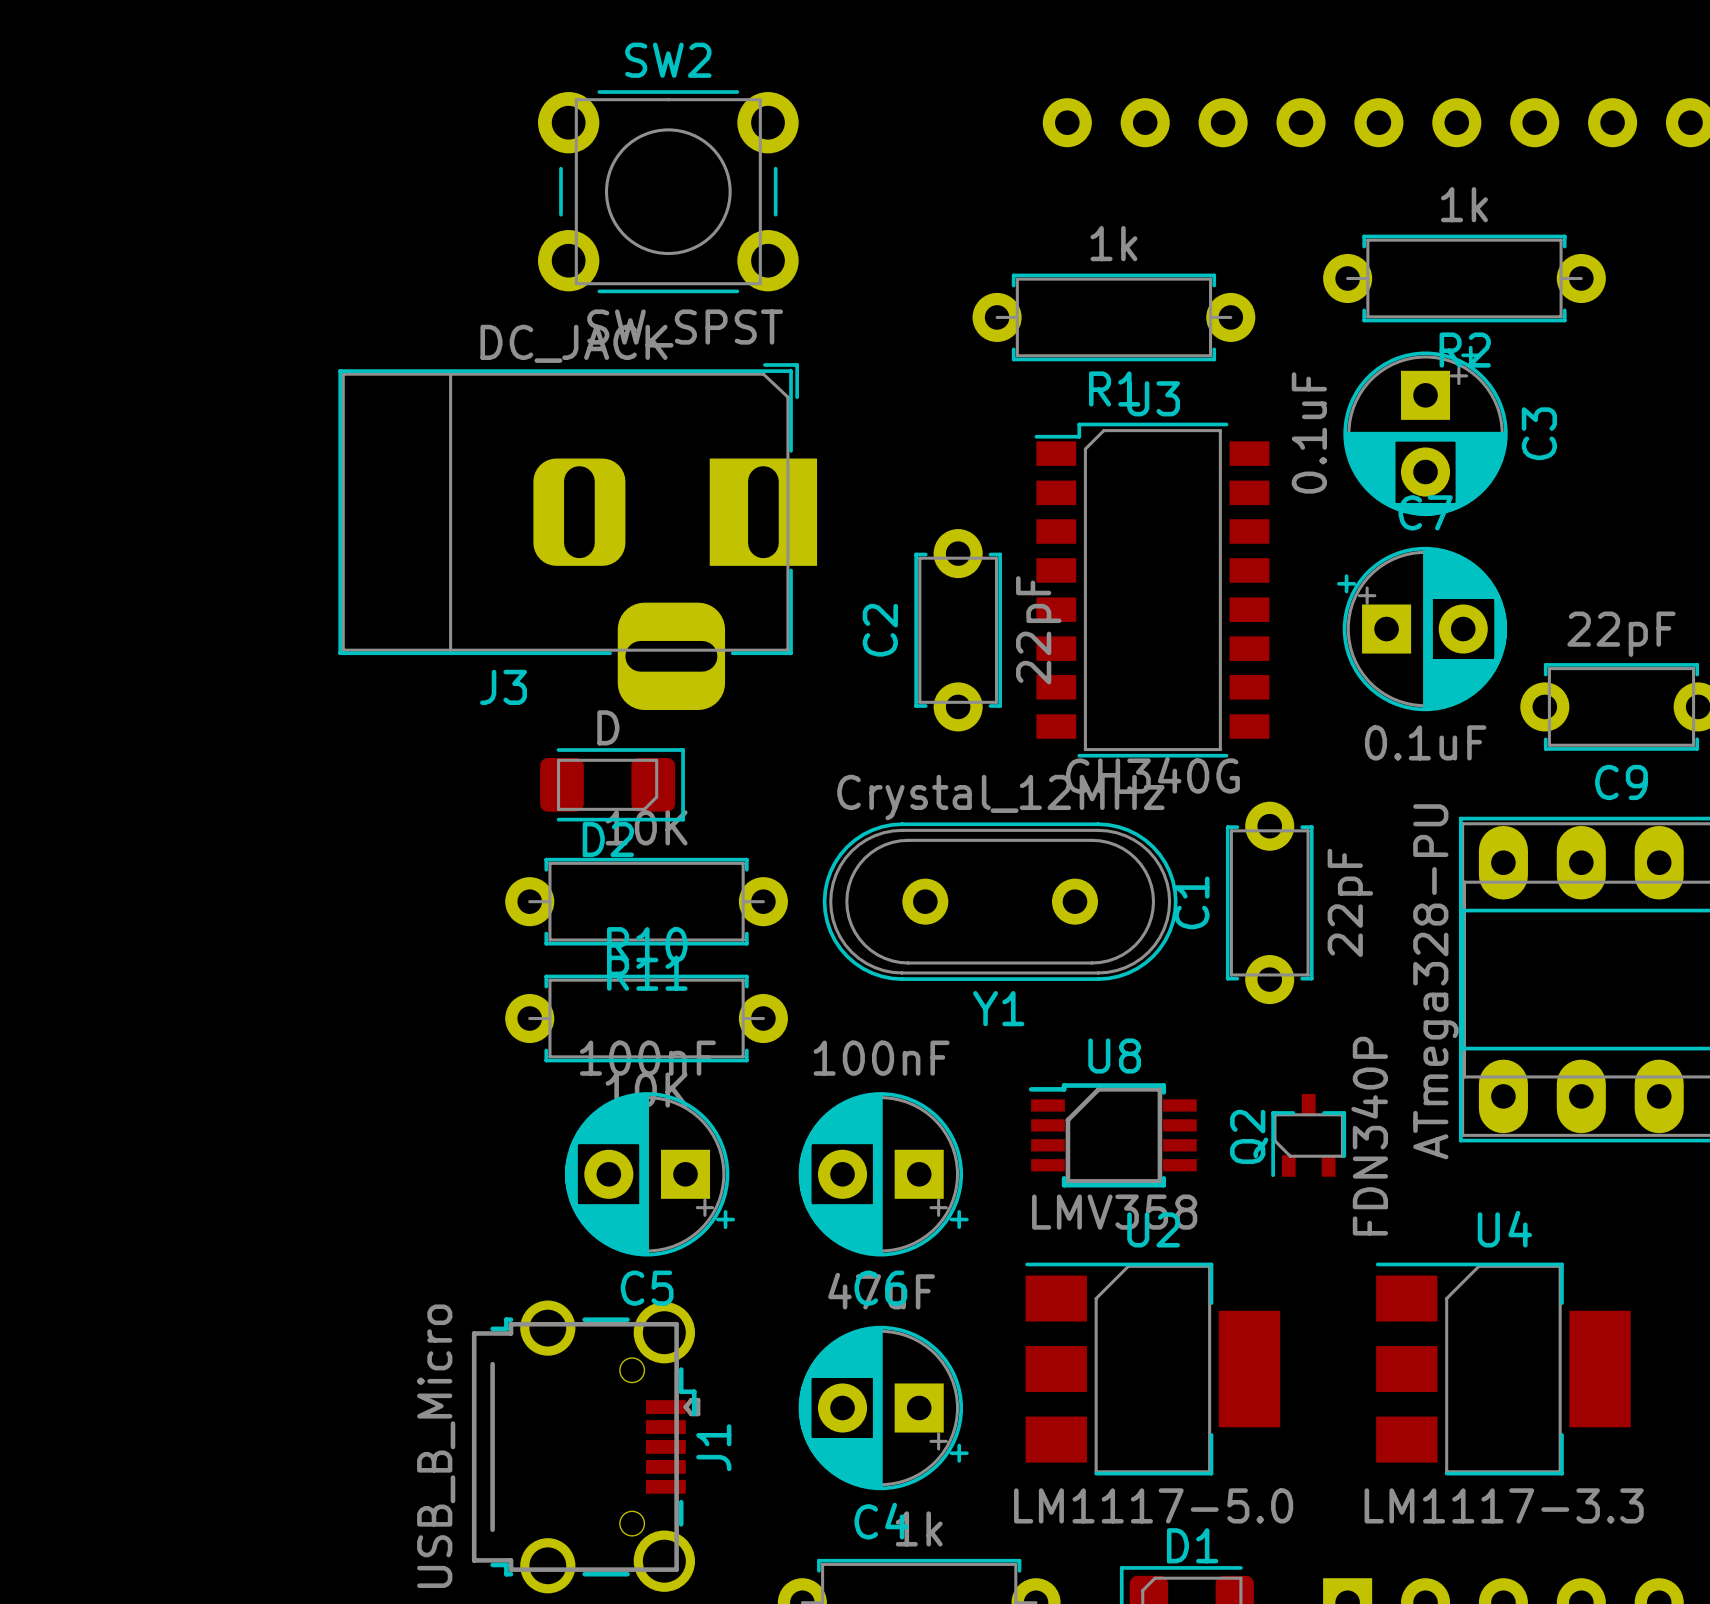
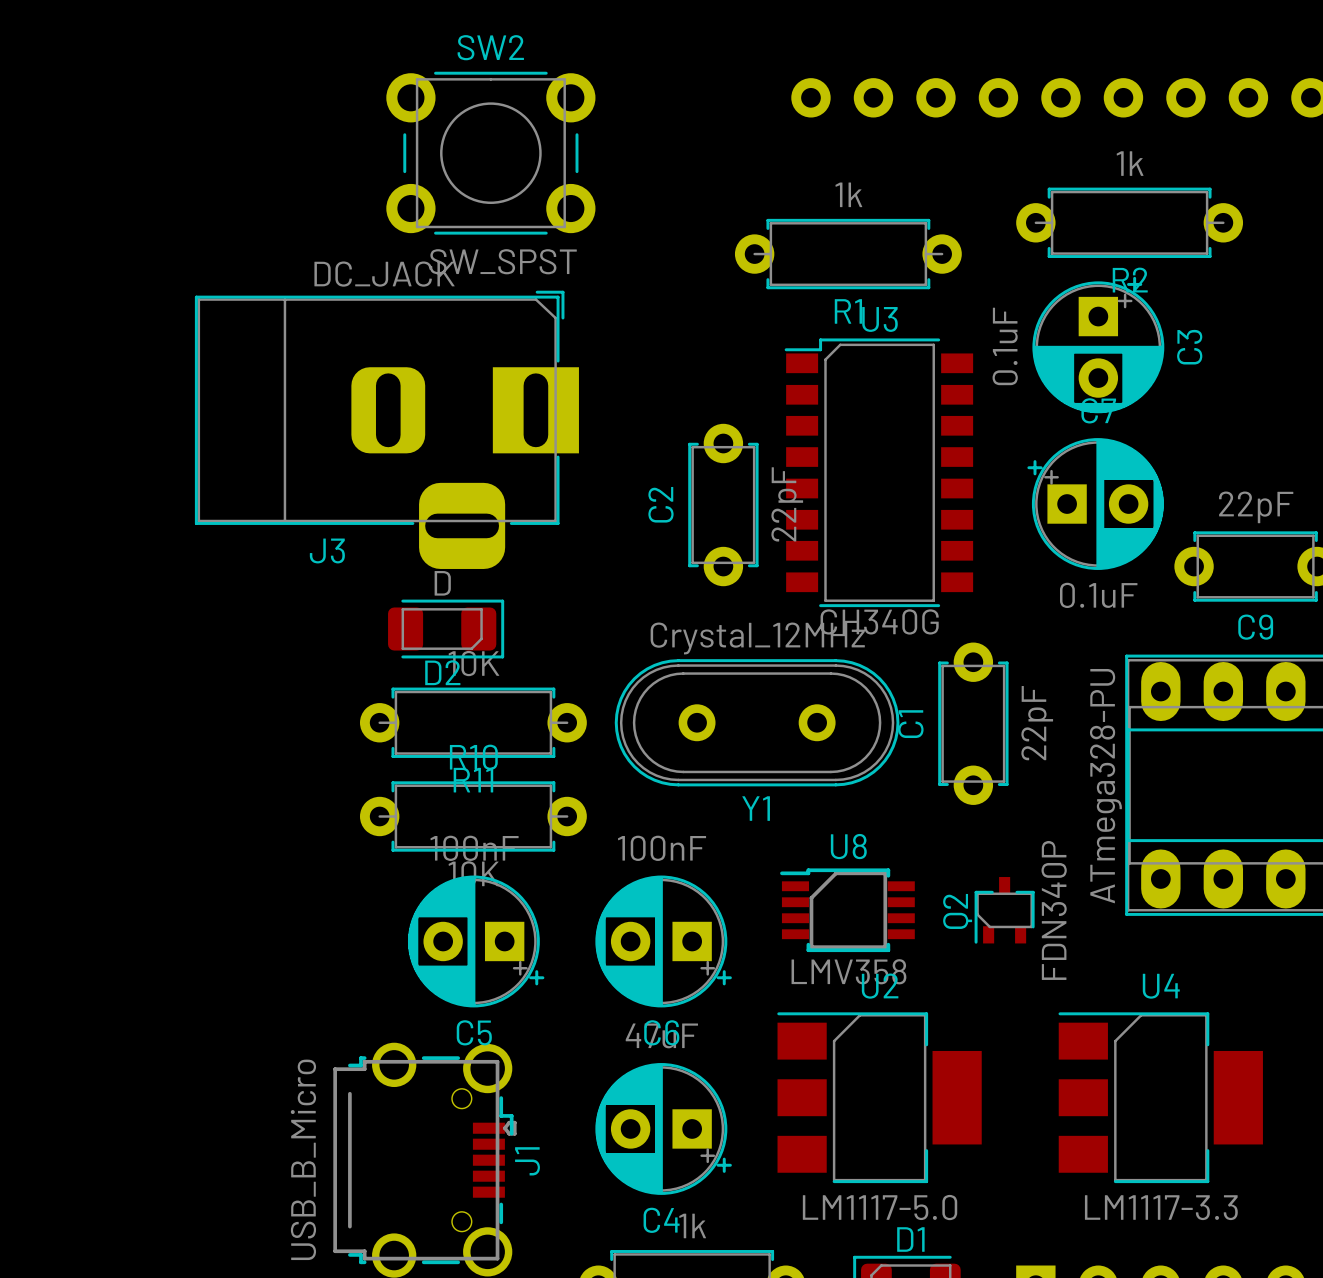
J3 position: (577, 536) -> (386, 429)

